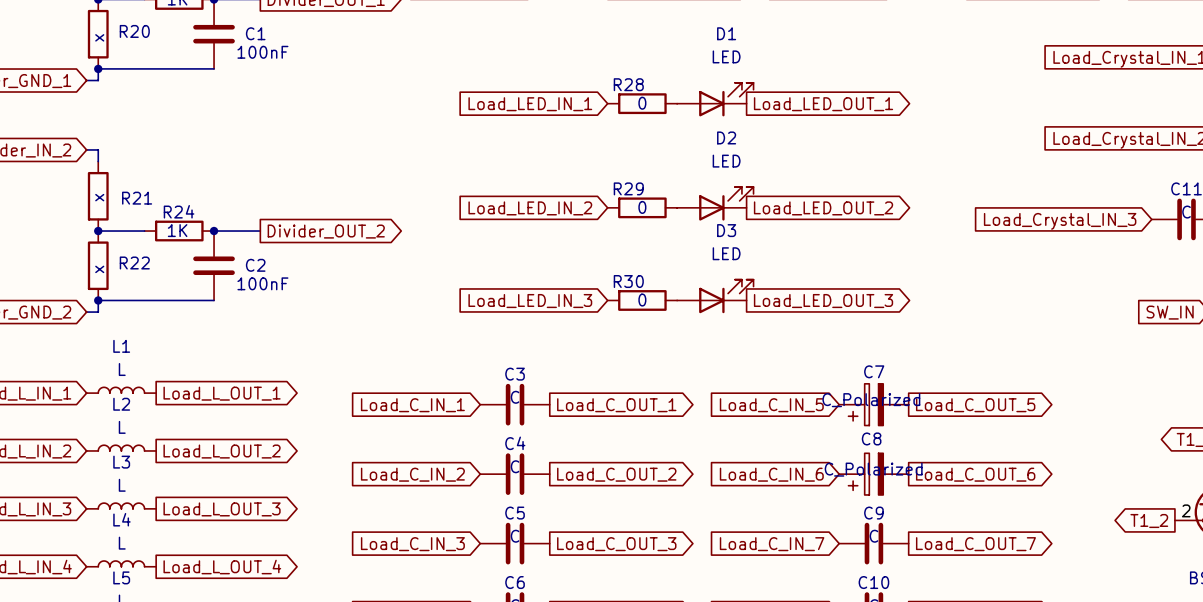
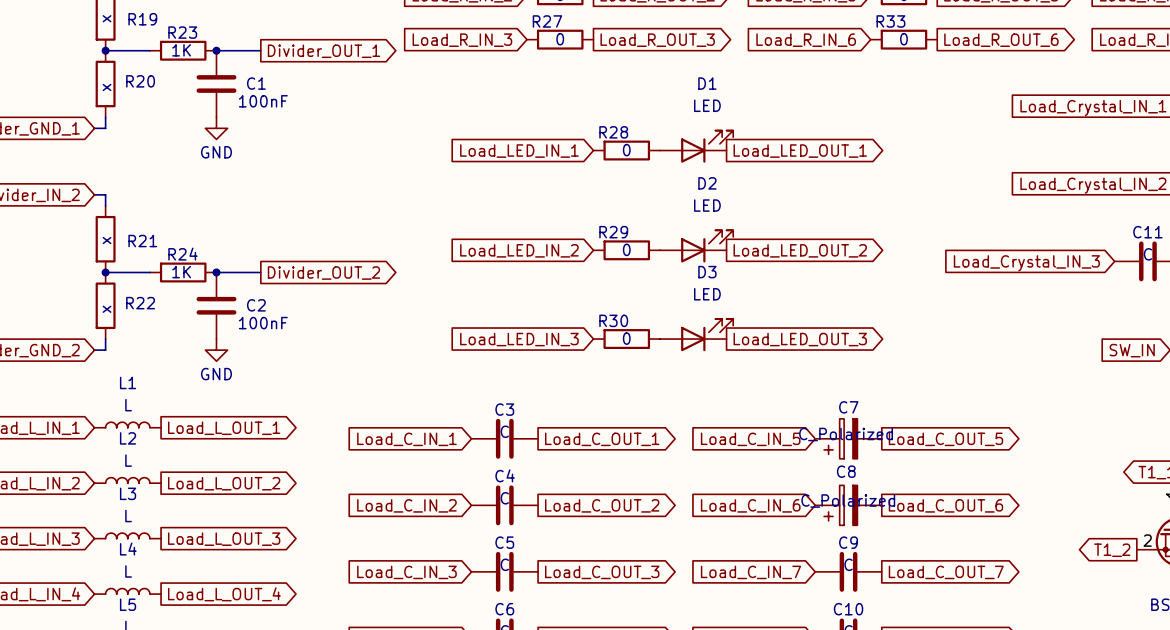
wire: (98, 68) (214, 68) -> none
junction: (98, 68) -> none
power symbol: none -> GND (216, 128)
wire: (98, 300) (214, 300) -> none
junction: (98, 300) -> none
power symbol: none -> GND (216, 350)

